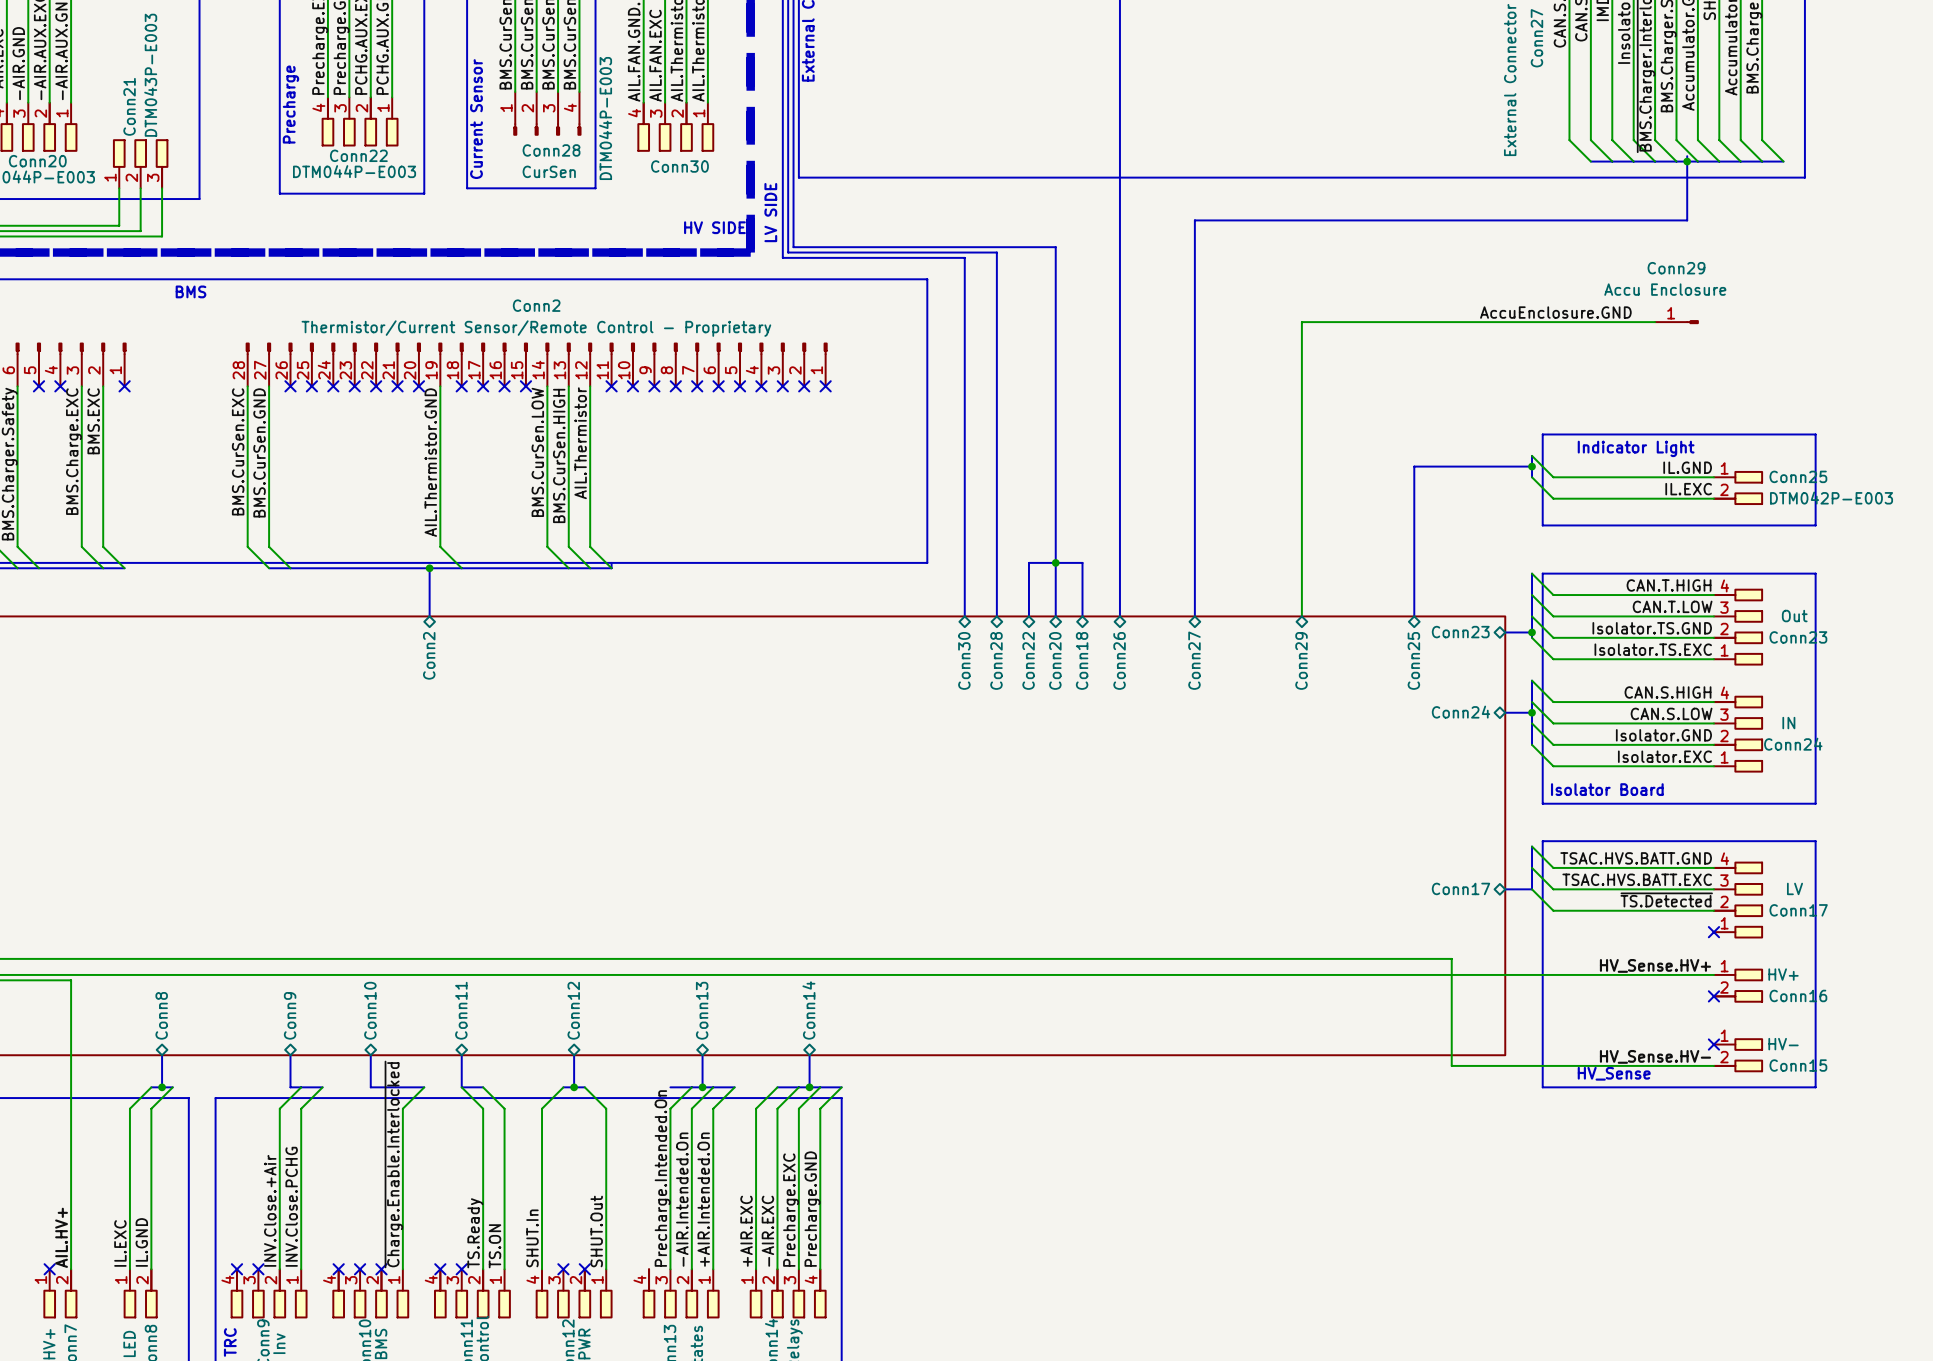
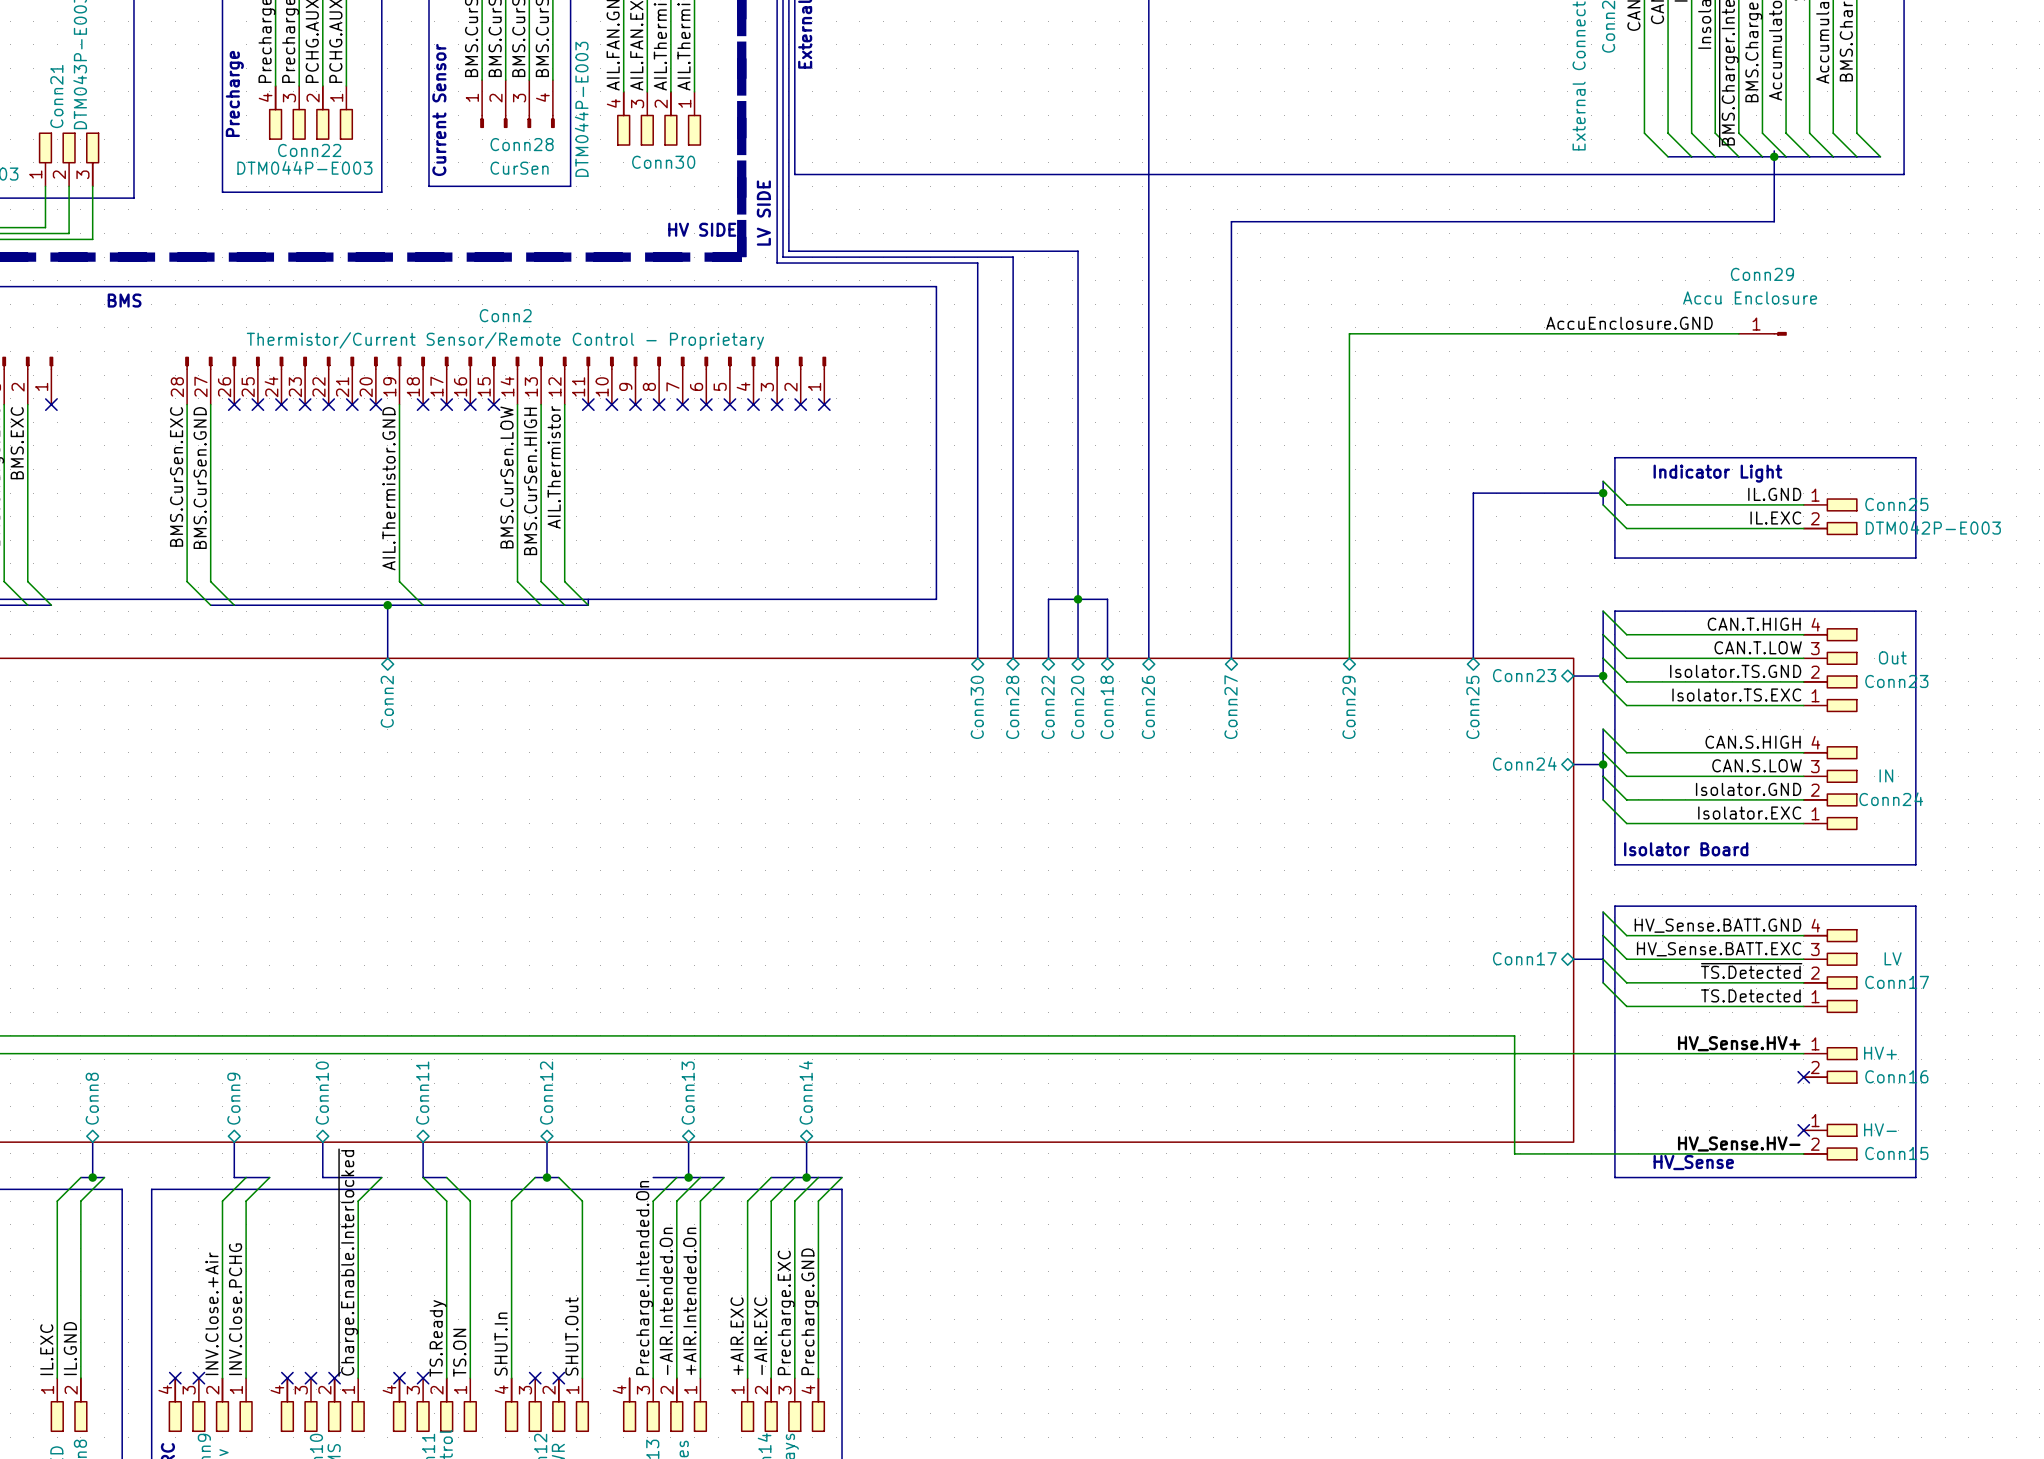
label: TSAC.HVS.BATT.GND (1636, 858) -> HV_Sense.BATT.GND (1717, 925)
label: TSAC.HVS.BATT.EXC (1637, 879) -> HV_Sense.BATT.EXC (1719, 949)
bus: none -> (1603, 959) (1603, 982)
wire: none -> (1603, 982) (1626, 1006)
label: none -> TS.Detected (1750, 995)
wire: none -> (1626, 1006) (1803, 1006)
no-connect mark: (1713, 932) -> none

